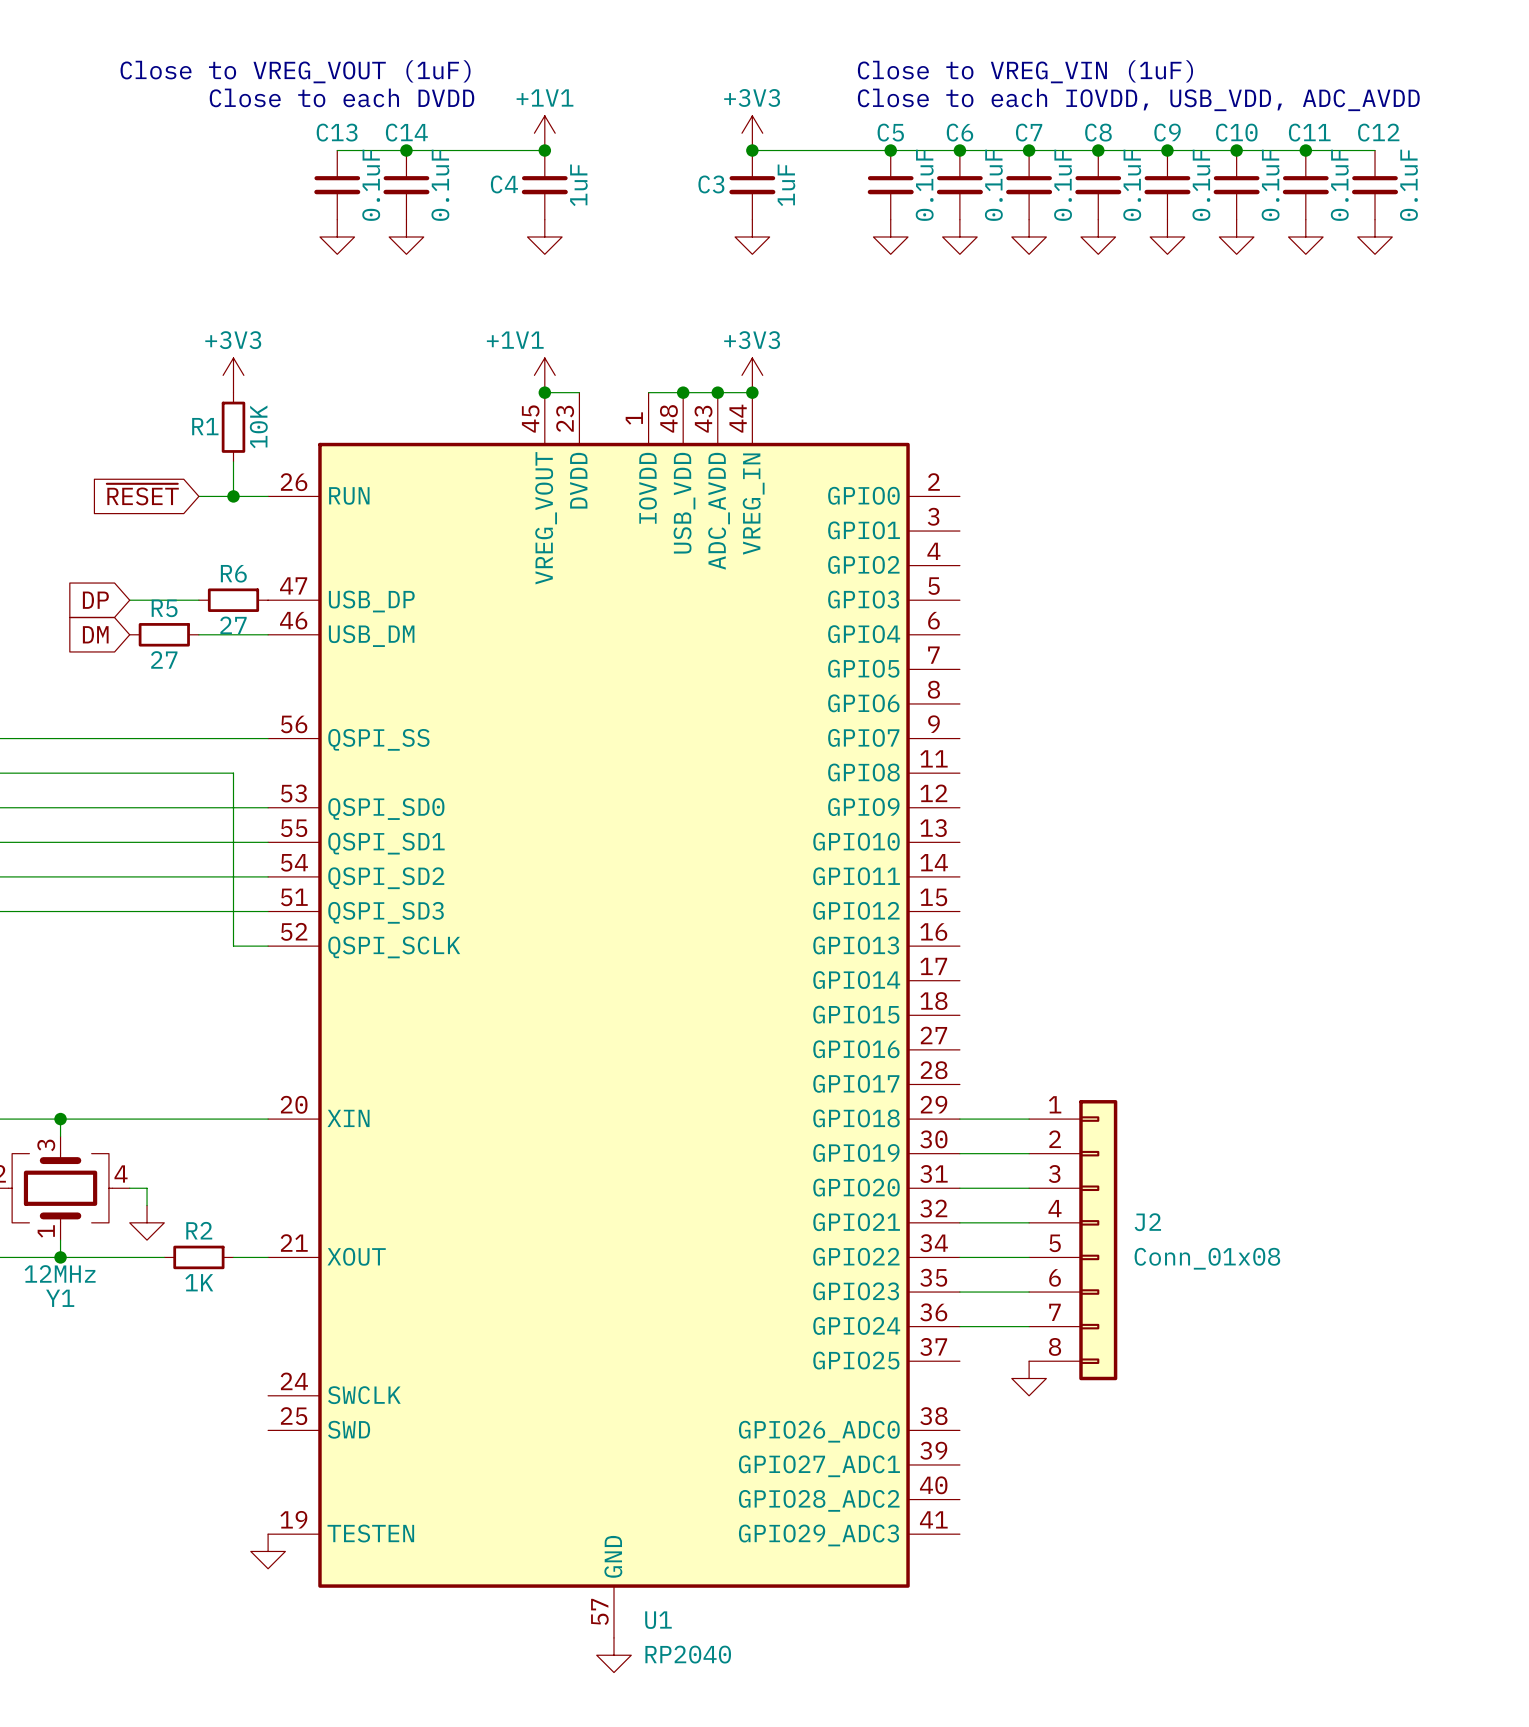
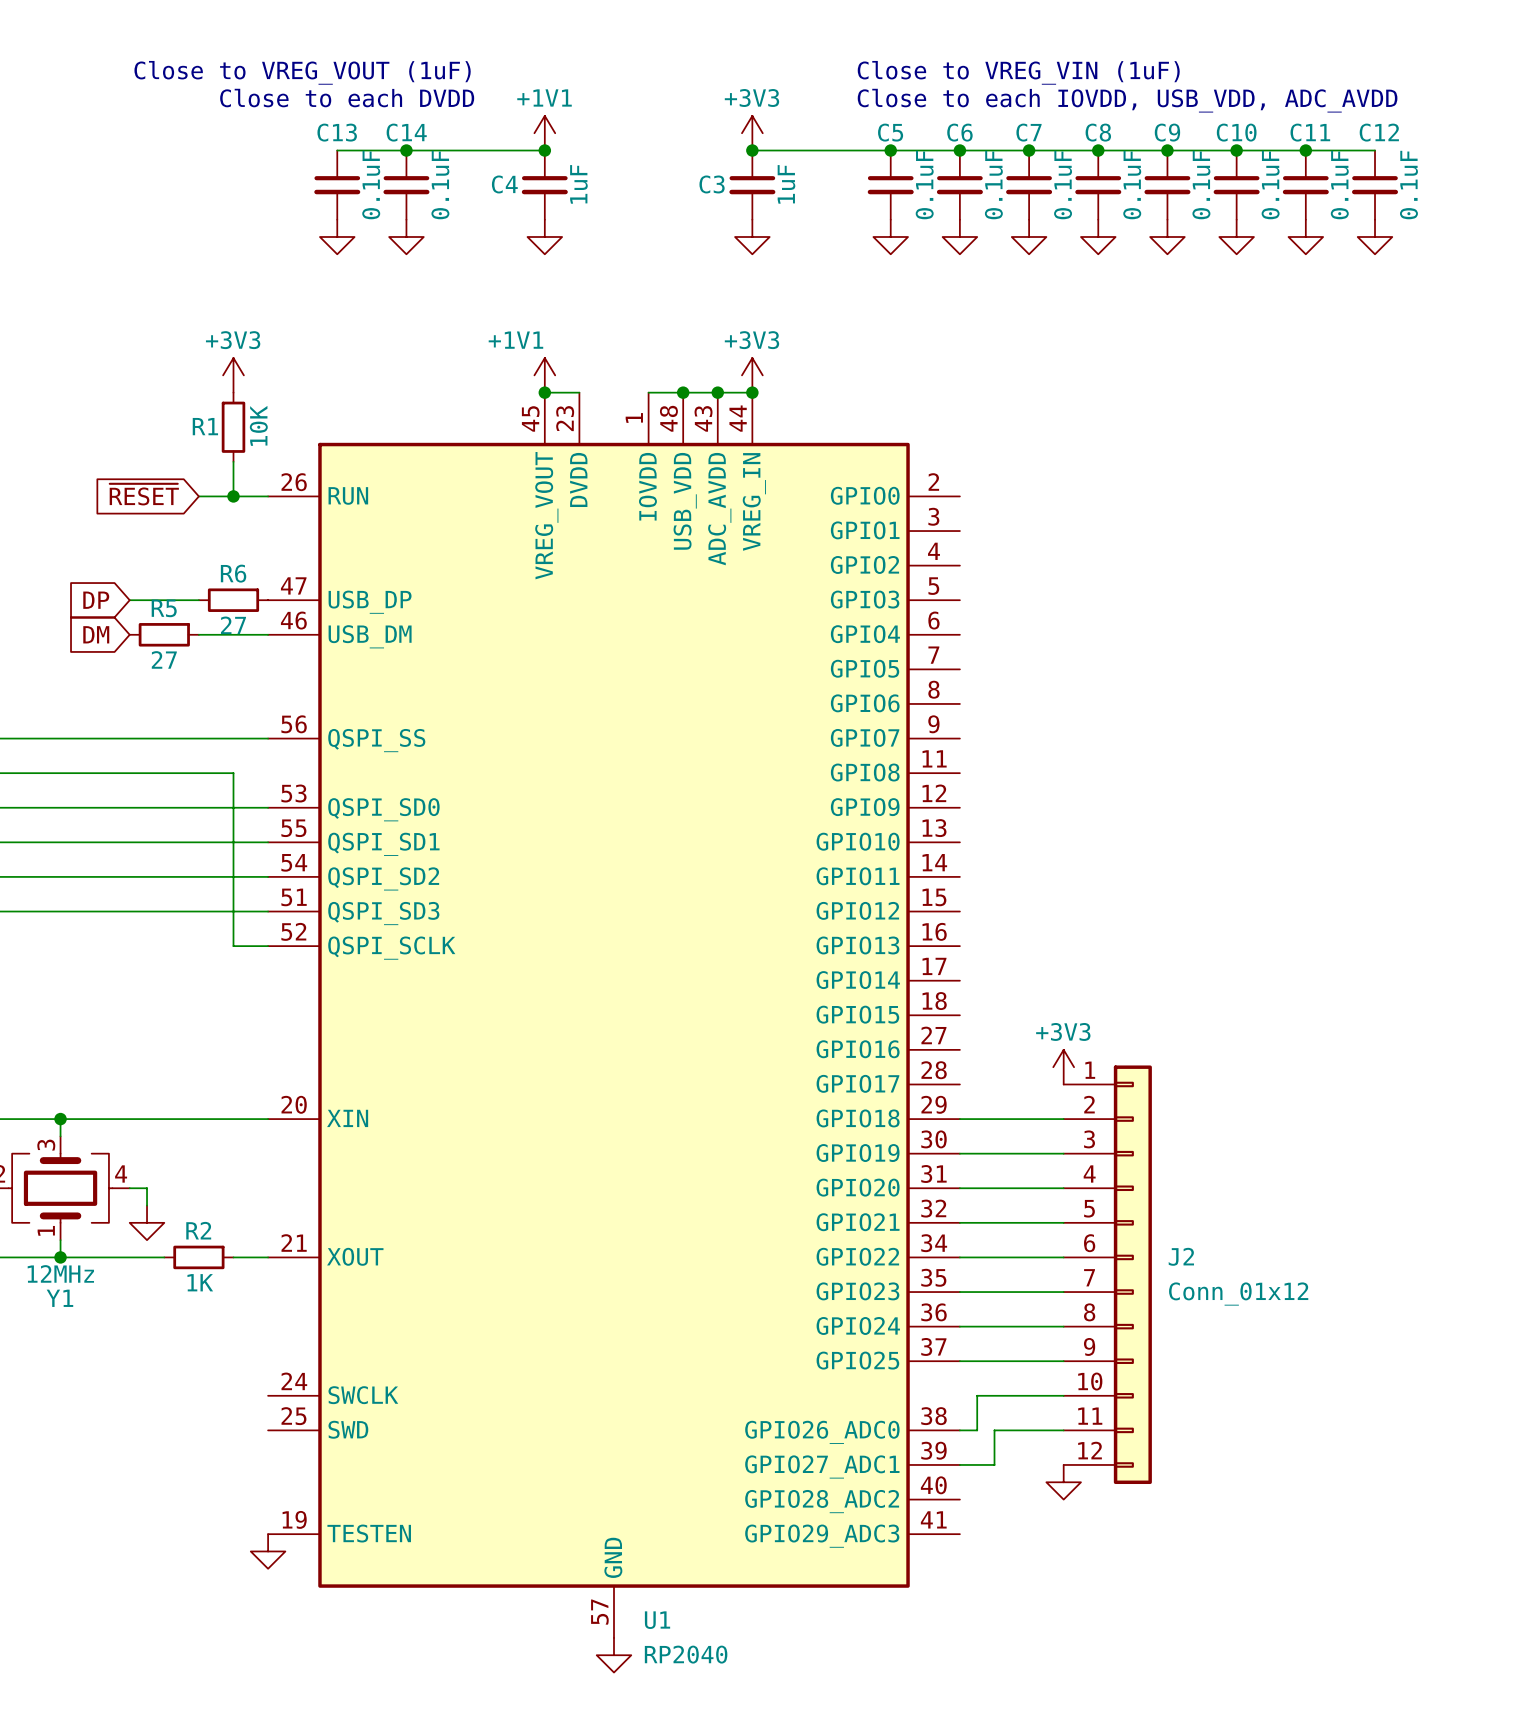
power symbol: none -> +3V3 (1063, 1067)
J2 symbol: [1029, 1100, 1118, 1381] -> [1063, 1065, 1152, 1485]
J2 value: Conn_01x08 (1207, 1258) -> Conn_01x12 (1238, 1294)
wire: none -> (959, 1361) (1063, 1361)
power symbol position: (1029, 1378) -> (1063, 1482)
wire: none -> (1063, 1395) (977, 1395) (977, 1430) (959, 1430)
wire: none -> (1063, 1430) (994, 1430) (994, 1464) (959, 1464)

